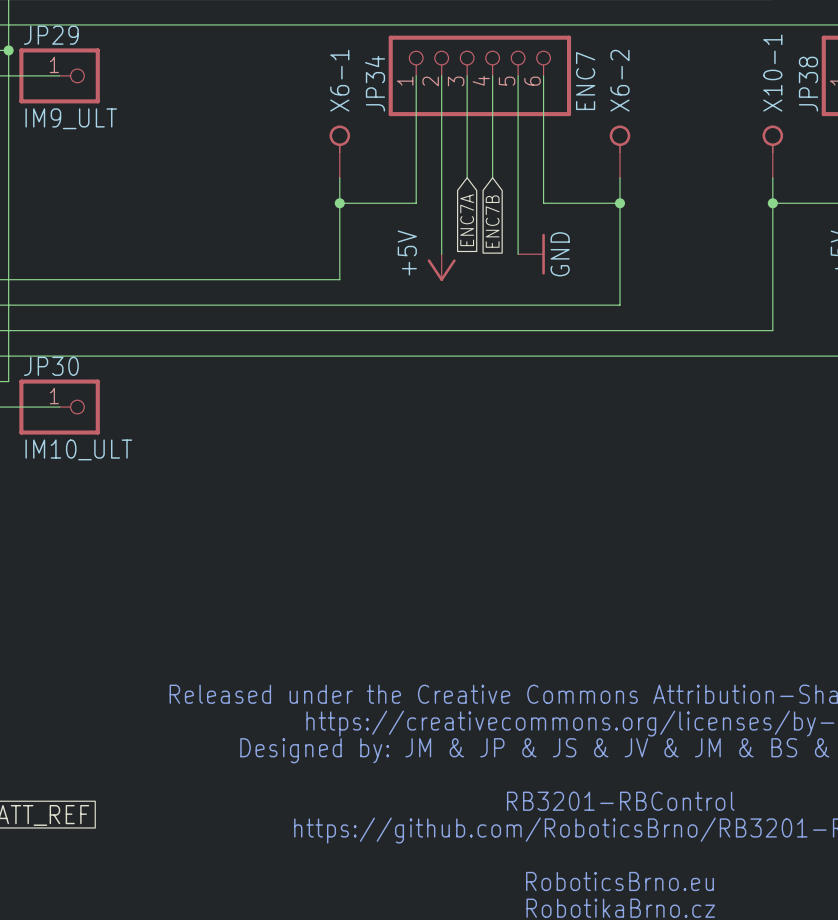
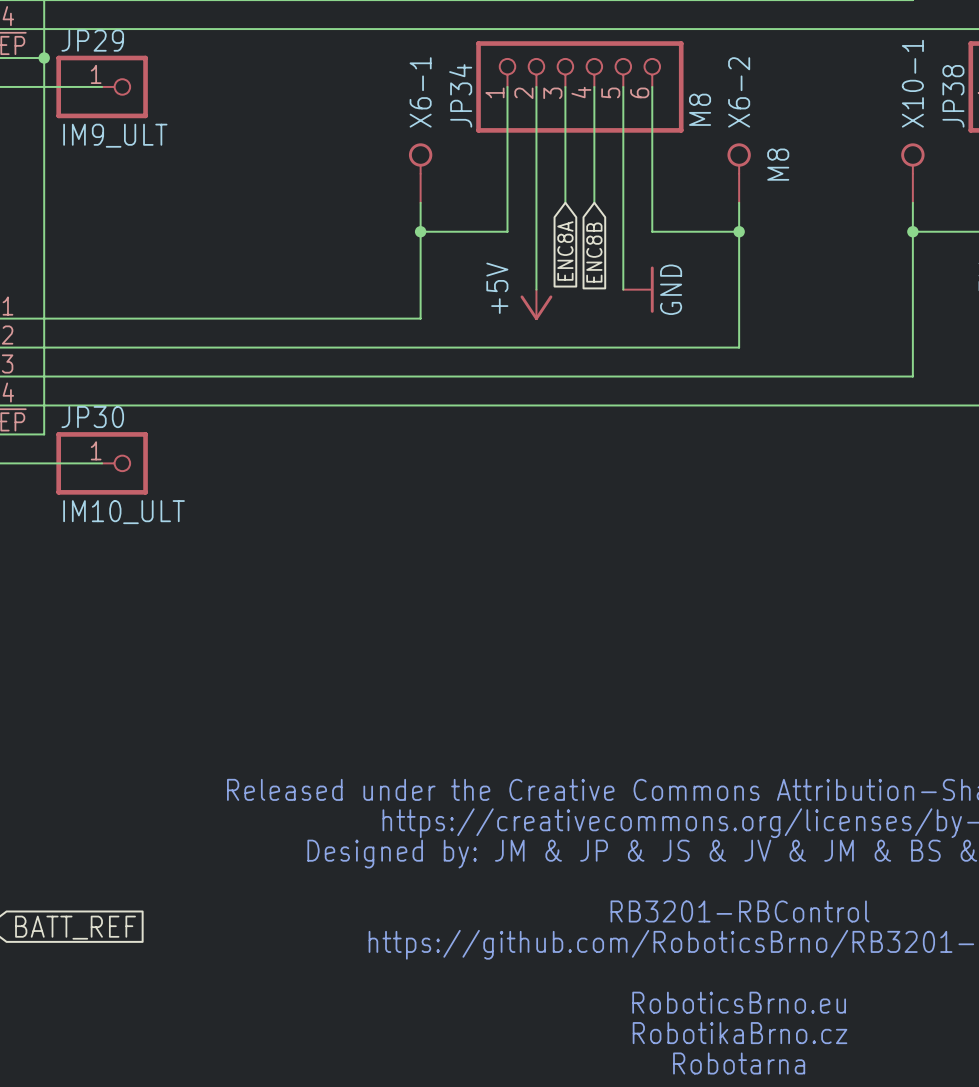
JP34 value: ENC7 (585, 81) -> M8 (700, 109)
X6-2 value: none -> M8 (778, 164)
global label: ENC7A (467, 220) -> ENC8A (565, 251)
global label: ENC7B (492, 221) -> ENC8B (594, 252)

